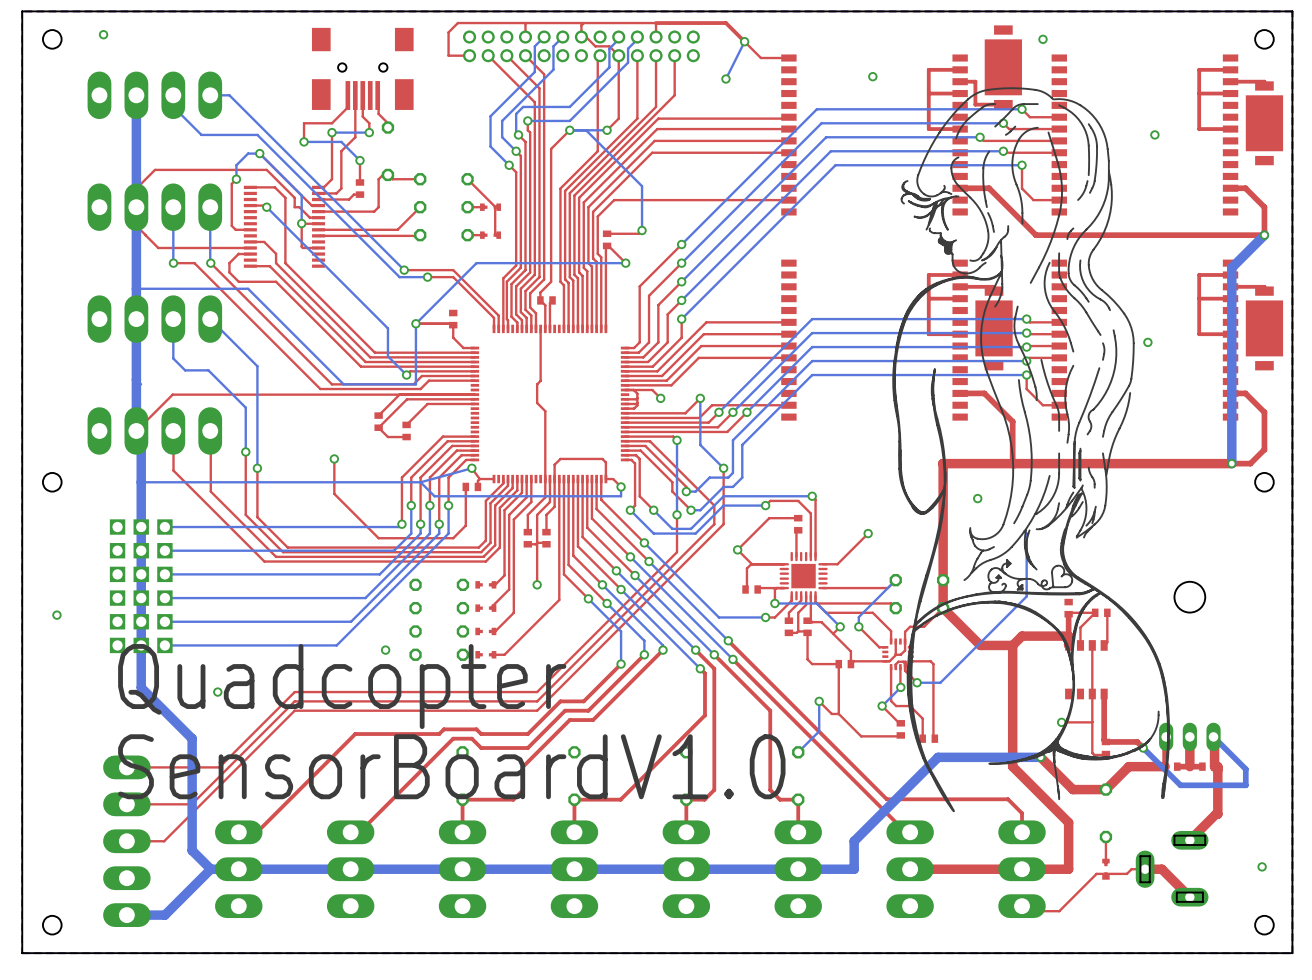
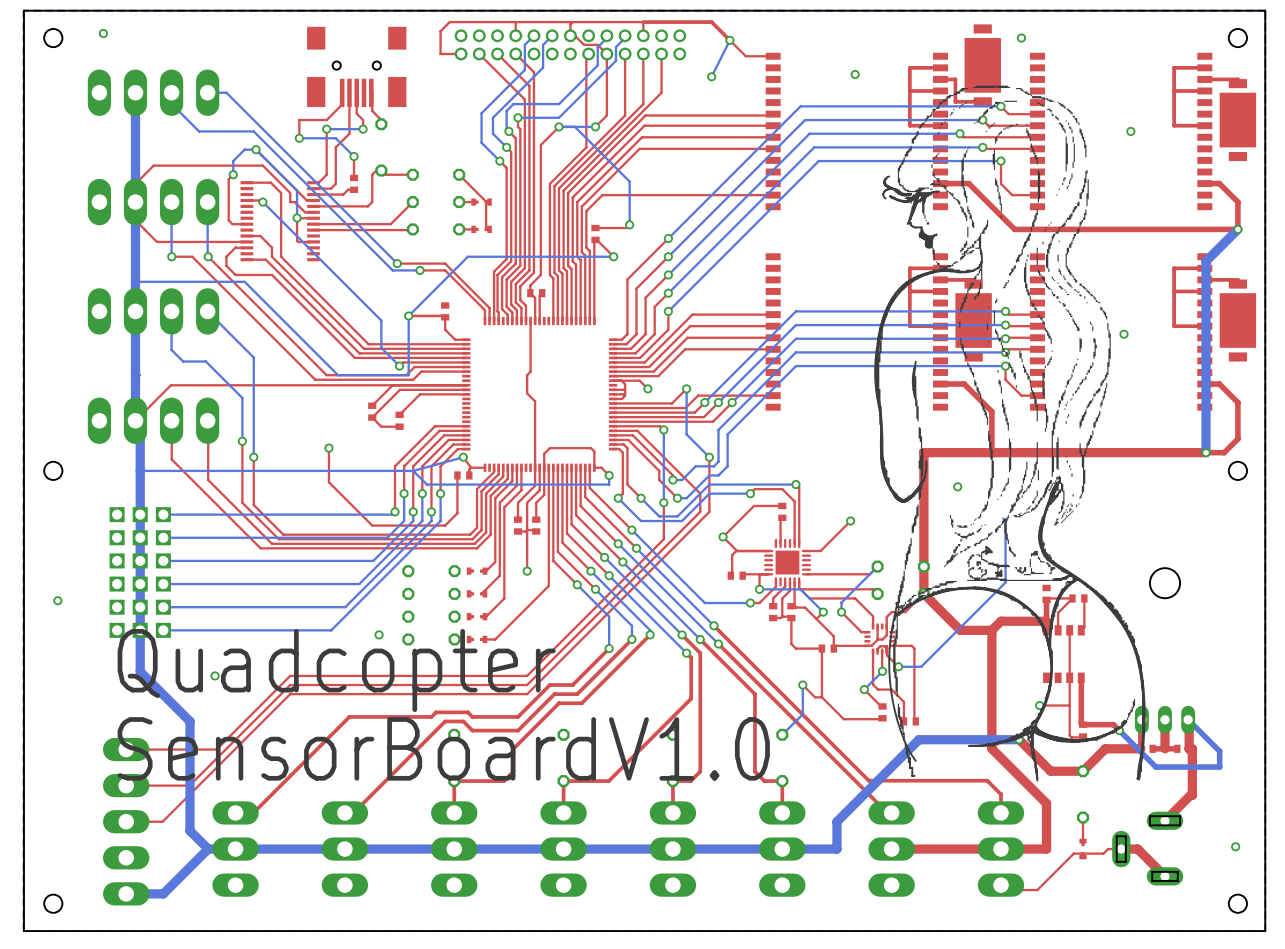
drawing: none -> [876, 85, 1145, 779]
line: (1053, 99) (1041, 91) (1019, 88) (988, 89) (970, 96) (952, 115) (939, 132) (918, 175) (918, 187) (926, 195) (937, 195) (944, 189) (944, 185) -> none
line: (1054, 99) (1067, 100) (1076, 103) (1096, 119) (1106, 143) (1108, 176) -> none
line: (995, 104) (983, 106) (969, 118) (961, 127) (956, 138) -> none
line: (1037, 104) (1016, 106) (995, 126) -> none
line: (1059, 105) (1075, 115) (1085, 131) (1088, 145) (1088, 175) -> none
line: (1088, 124) (1094, 133) (1097, 146) (1094, 181) (1089, 192) -> none
line: (1015, 126) (1005, 134) -> none
line: (1037, 127) (1029, 129) (1022, 134) (1016, 143) (1012, 157) (1013, 175) (1021, 203) (1022, 223) -> none
line: (1048, 132) (1060, 176) (1061, 202) (1050, 242) (1030, 282) -> none
line: (989, 151) (983, 168) (986, 207) -> none
line: (958, 157) (951, 165) (953, 177) (979, 208) (988, 230) (987, 242) (983, 253) (978, 259) (970, 260) -> none
line: (1108, 171) (1111, 191) (1110, 212) (1104, 231) (1090, 254) (1089, 268) (1096, 284) (1113, 301) (1127, 318) (1132, 332) (1133, 352) (1130, 382) (1109, 416) (1102, 436) -> none
line: (1108, 175) (1107, 193) (1103, 204) (1094, 220) (1077, 240) (1069, 263) (1070, 279) (1088, 301) -> none
line: (1087, 181) (1084, 191) (1078, 200) -> none
line: (940, 192) (951, 194) -> none
line: (950, 197) (943, 202) (941, 208) (943, 219) (945, 226) (947, 229) (943, 219) (943, 205) -> none
line: (932, 210) (924, 216) (914, 216) (924, 217) (932, 211) -> none
line: (988, 213) (994, 231) -> none
line: (1008, 226) (1007, 233) (996, 247) -> none
line: (1073, 228) (1067, 239) -> none
line: (1001, 240) (1002, 288) (995, 306) -> none
line: (996, 247) (988, 256) (982, 260) (990, 255) (996, 247) -> none
line: (950, 253) (952, 253) (954, 267) (962, 273) (974, 271) (985, 262) -> none
line: (1059, 253) (1059, 273) (1061, 281) (1083, 308) (1100, 335) -> none
line: (1080, 260) (1080, 274) (1084, 283) (1092, 294) (1105, 302) (1110, 310) -> none
line: (1049, 262) (1044, 277) (1045, 292) (1048, 302) (1066, 331) (1073, 351) -> none
line: (966, 276) (989, 279) (1001, 272) (984, 310) (981, 341) (984, 364) (1007, 427) (1013, 466) (1011, 495) (1001, 529) (990, 537) (980, 539) (972, 535) (970, 528) -> none
line: (1017, 306) (1014, 321) (1015, 335) (1032, 376) (1036, 400) -> none
line: (1113, 330) (1116, 355) (1113, 375) (1105, 393) (1089, 413) (1091, 427) (1087, 434) -> none
line: (1102, 343) (1104, 350) (1102, 359) -> none
line: (1041, 359) (1058, 411) (1059, 430) -> none
line: (1073, 365) (1065, 389) (1065, 402) (1069, 424) (1067, 442) -> none
line: (1099, 368) (1075, 433) (1074, 487) (1074, 441) -> none
line: (1018, 380) (1030, 437) (1031, 463) (1028, 491) (1014, 523) -> none
line: (1130, 393) (1124, 417) (1111, 449) (1106, 474) -> none
line: (1080, 448) (1080, 480) -> none
line: (1080, 451) (1080, 479) -> none
line: (1059, 453) (1058, 478) (1055, 492) (1047, 504) (1035, 513) -> none
line: (1102, 453) (1106, 481) (1104, 509) (1097, 521) (1076, 537) (1086, 514) (1085, 501) (1081, 488) -> none
line: (1088, 467) (1094, 487) -> none
line: (1049, 475) (1038, 506) (1017, 540) (1005, 552) (982, 563) (971, 573) -> none
line: (1082, 485) (1055, 520) (1044, 527) (1036, 529) -> none
line: (1059, 503) (1053, 519) (1040, 529) -> none
line: (1095, 506) (1092, 516) (1086, 525) -> none
line: (1094, 512) (1092, 523) -> none
line: (1092, 526) (1084, 537) -> none
line: (970, 530) (973, 542) (977, 548) (985, 550) (994, 546) -> none
line: (1025, 530) (1024, 544) (1027, 557) (1036, 569) -> none
line: (1029, 530) (1027, 551) (1034, 567) -> none
line: (983, 550) (970, 574) (964, 580) -> none
line: (1007, 563) (1002, 566) (1004, 573) (1014, 578) (1024, 578) -> none
line: (1005, 574) (997, 568) (990, 570) (988, 576) (990, 581) (996, 582) (998, 577) -> none
line: (998, 575) (996, 577) (1001, 577) (998, 575) -> none
line: (1062, 575) (1061, 576) -> (897, 602) (896, 603)
line: (1062, 575) (1070, 576) (1072, 579) (1070, 584) (1065, 587) (1053, 587) -> none
line: (1062, 575) (1064, 570) (1062, 566) (1057, 565) (1053, 568) (1052, 572) (1053, 587) -> none
line: (991, 582) (989, 589) (997, 593) -> none
line: (1002, 584) (1005, 584) (1005, 586) (998, 593) -> none
line: (1021, 586) (1021, 588) (1018, 585) (1018, 581) (1027, 578) (1033, 579) (1041, 585) (1042, 586) (1044, 585) (1046, 584) (1045, 580) (1043, 580) (1041, 583) (1041, 585) (1041, 585) (1041, 586) (1042, 586) (1045, 589) (1053, 587) -> none
line: (915, 623) (929, 612) (939, 605) (956, 599) (976, 594) (1004, 591) (1081, 593) (1093, 589) (1079, 594) (1002, 592) (966, 596) (945, 603) (932, 610) (921, 619) (914, 628) -> none
line: (1158, 711) (1157, 723) (1153, 734) (1139, 748) -> none
line: none -> (909, 762) (908, 762) (908, 758) (909, 758) (909, 767) (912, 767) (912, 775) (914, 775)
line: (952, 809) (932, 777) (928, 768) (925, 759) (922, 750) (914, 718) (912, 706) (911, 694) (910, 683) (910, 659) (915, 624) (917, 612) (939, 530) (944, 495) (944, 483) (944, 471) (943, 459) (933, 404) (933, 397) (932, 390) (933, 383) (934, 369) (933, 380) (932, 391) (932, 396) (933, 402) (935, 410) (943, 450) (945, 472) (945, 482) (944, 493) (936, 540) (916, 614) (914, 627) (911, 655) (911, 697) (912, 711) (914, 726) (920, 748) (926, 762) (930, 769) (953, 811) -> none

